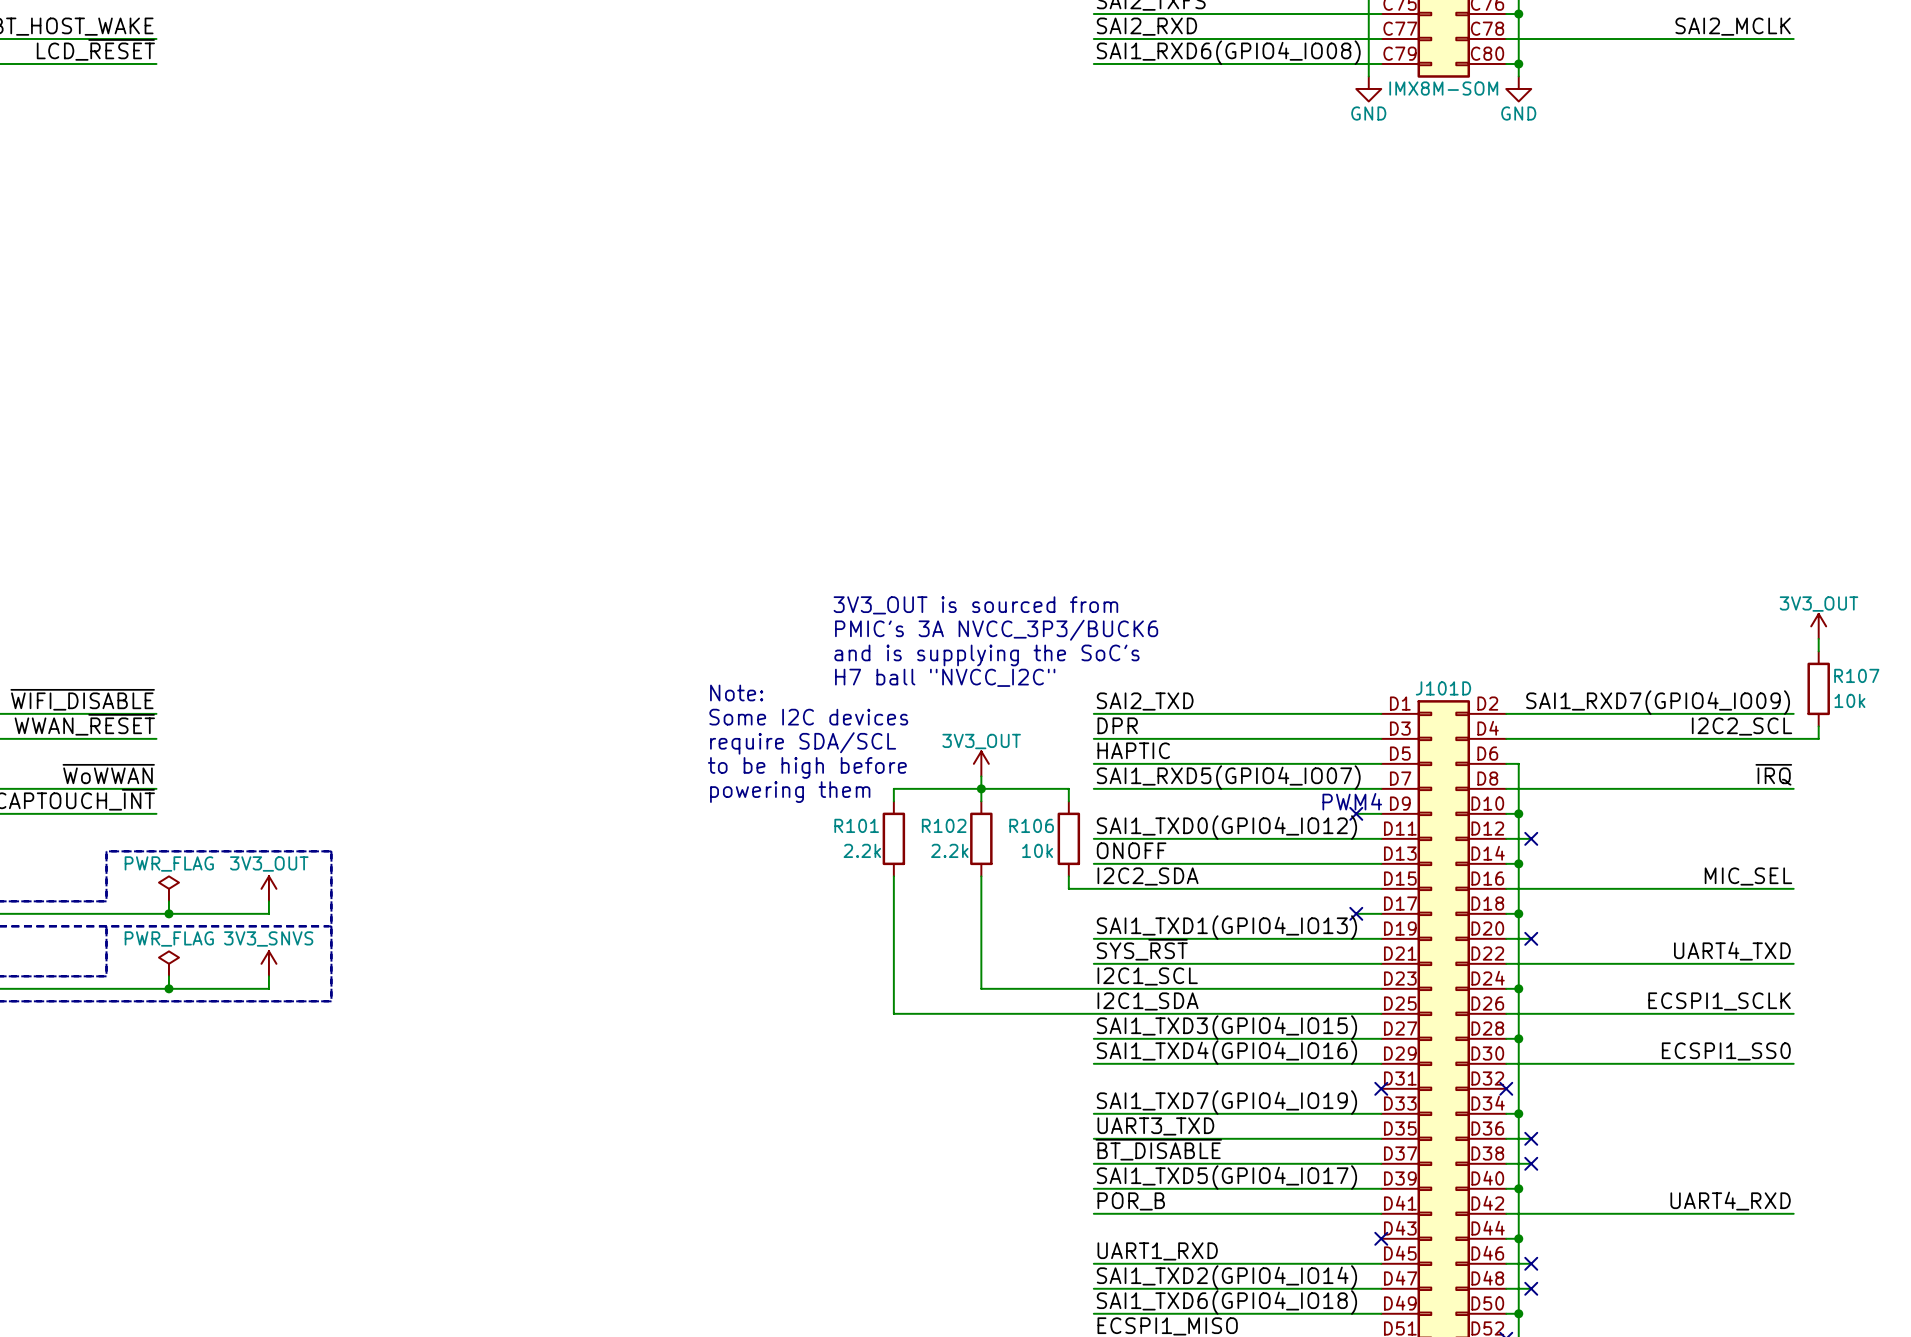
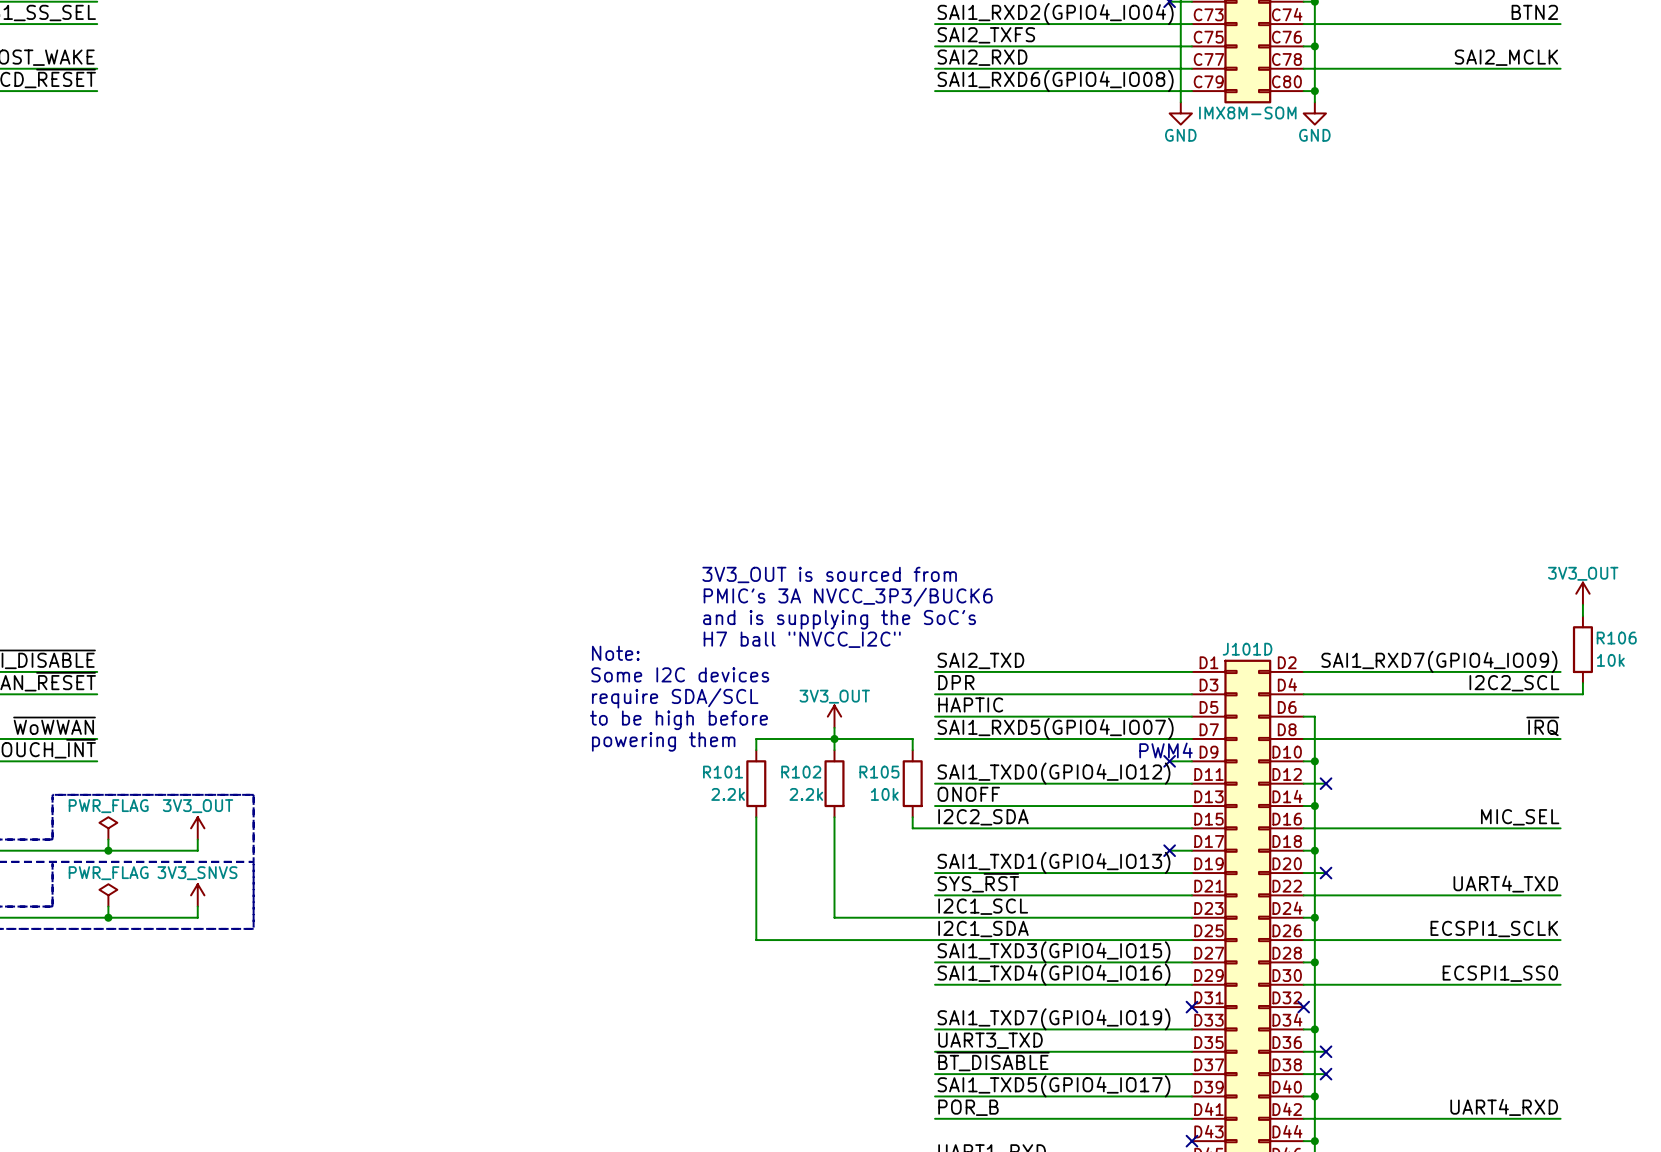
R107 name: R107 (1856, 675) -> R106 (1616, 638)
R106 name: R106 (1031, 825) -> R105 (879, 772)

